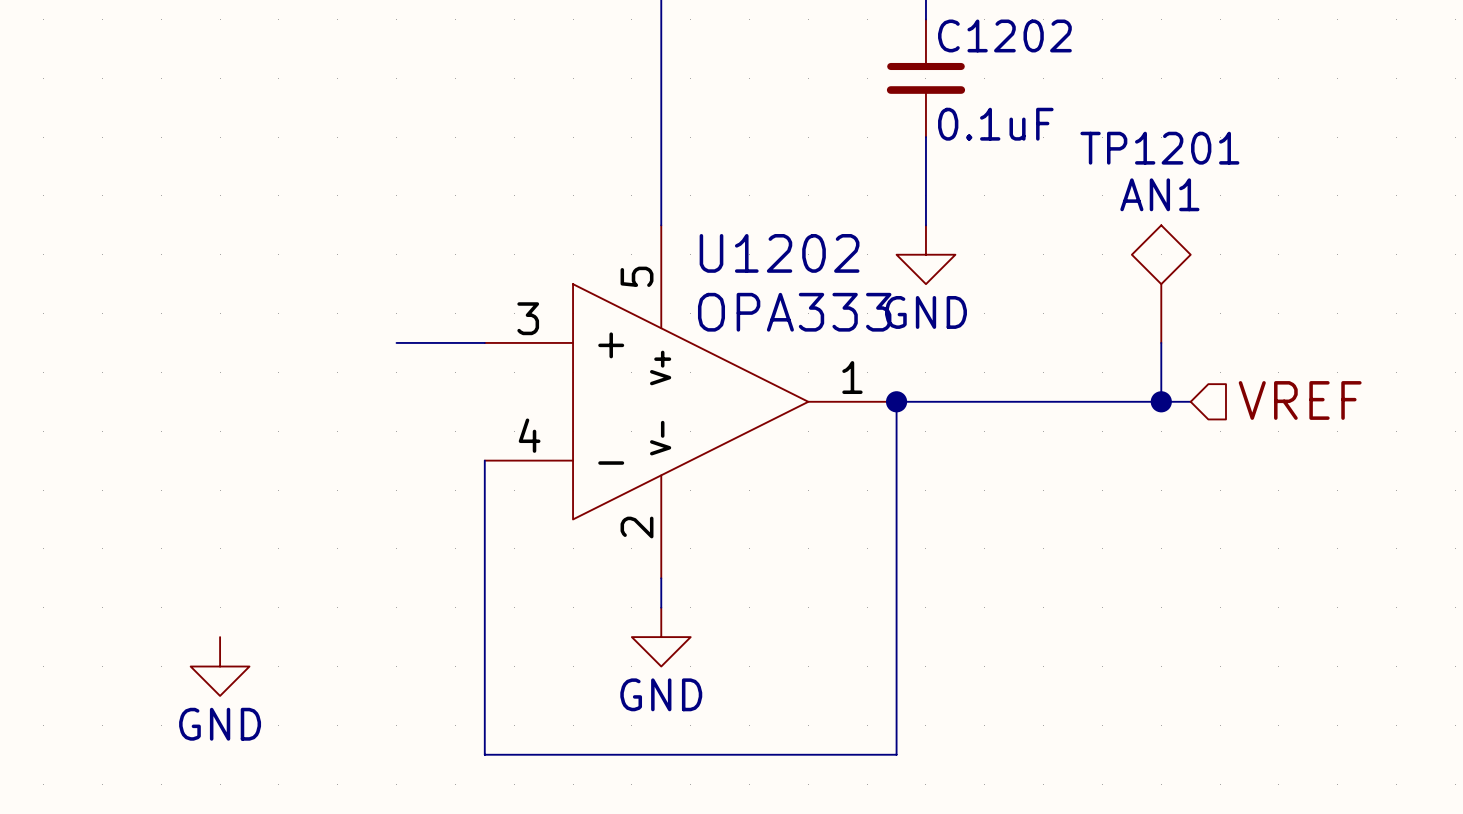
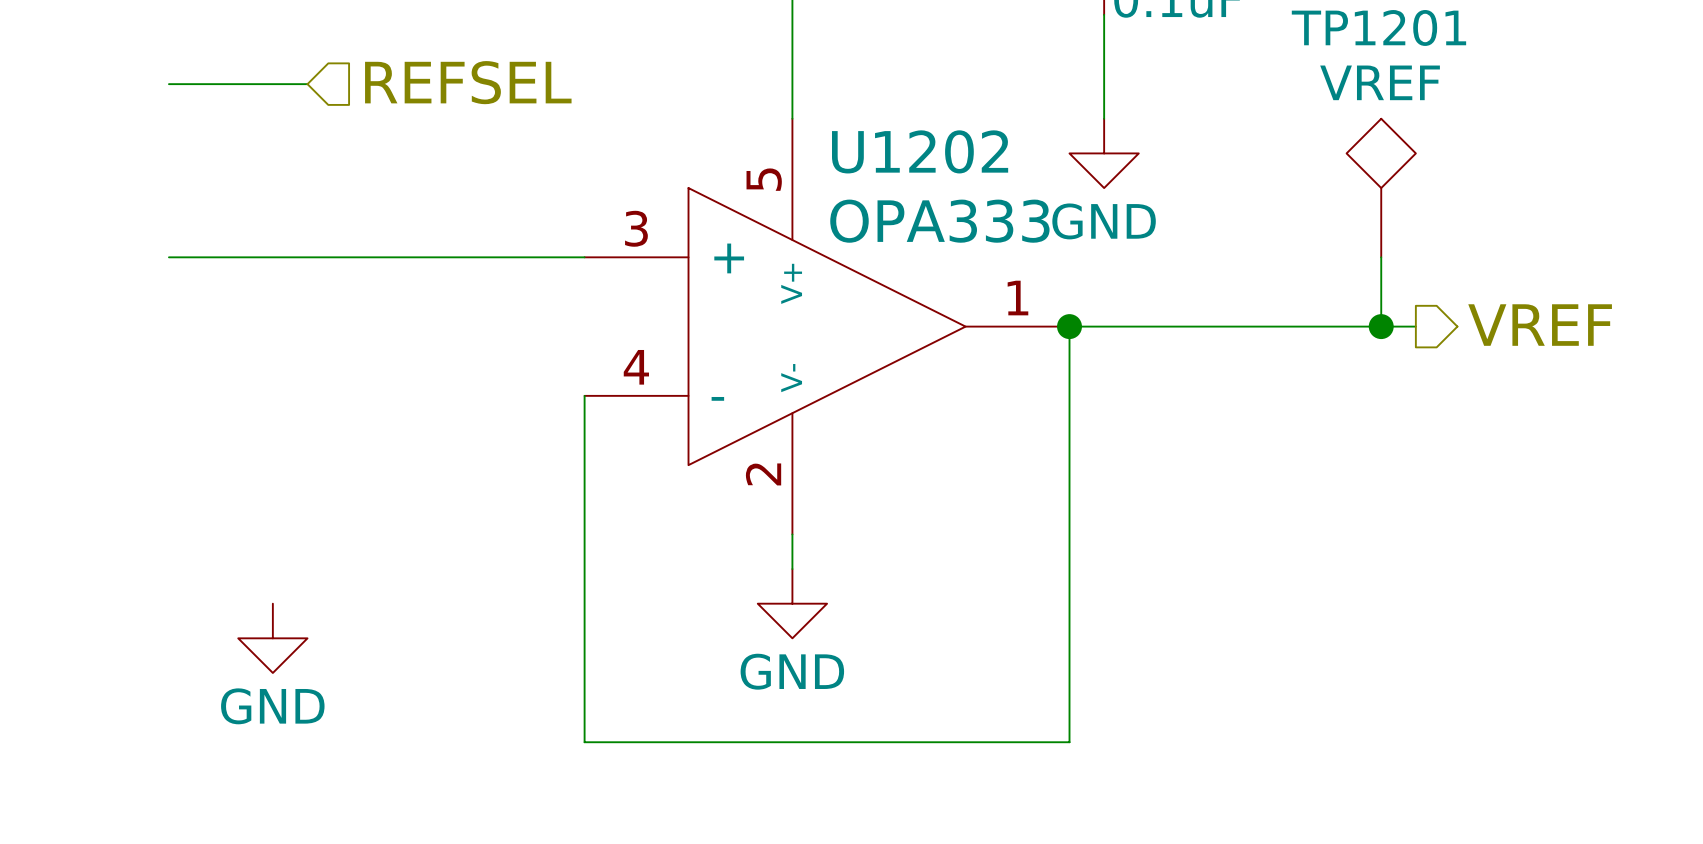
hierarchical label: none -> REFSEL (468, 82)
TP1201 value: AN1 (1159, 194) -> VREF (1380, 82)
wire: none -> (168, 84) (307, 84)
wire: none -> (168, 257) (480, 257)
hierarchical label shape: input (1300, 400) -> output (1540, 325)

